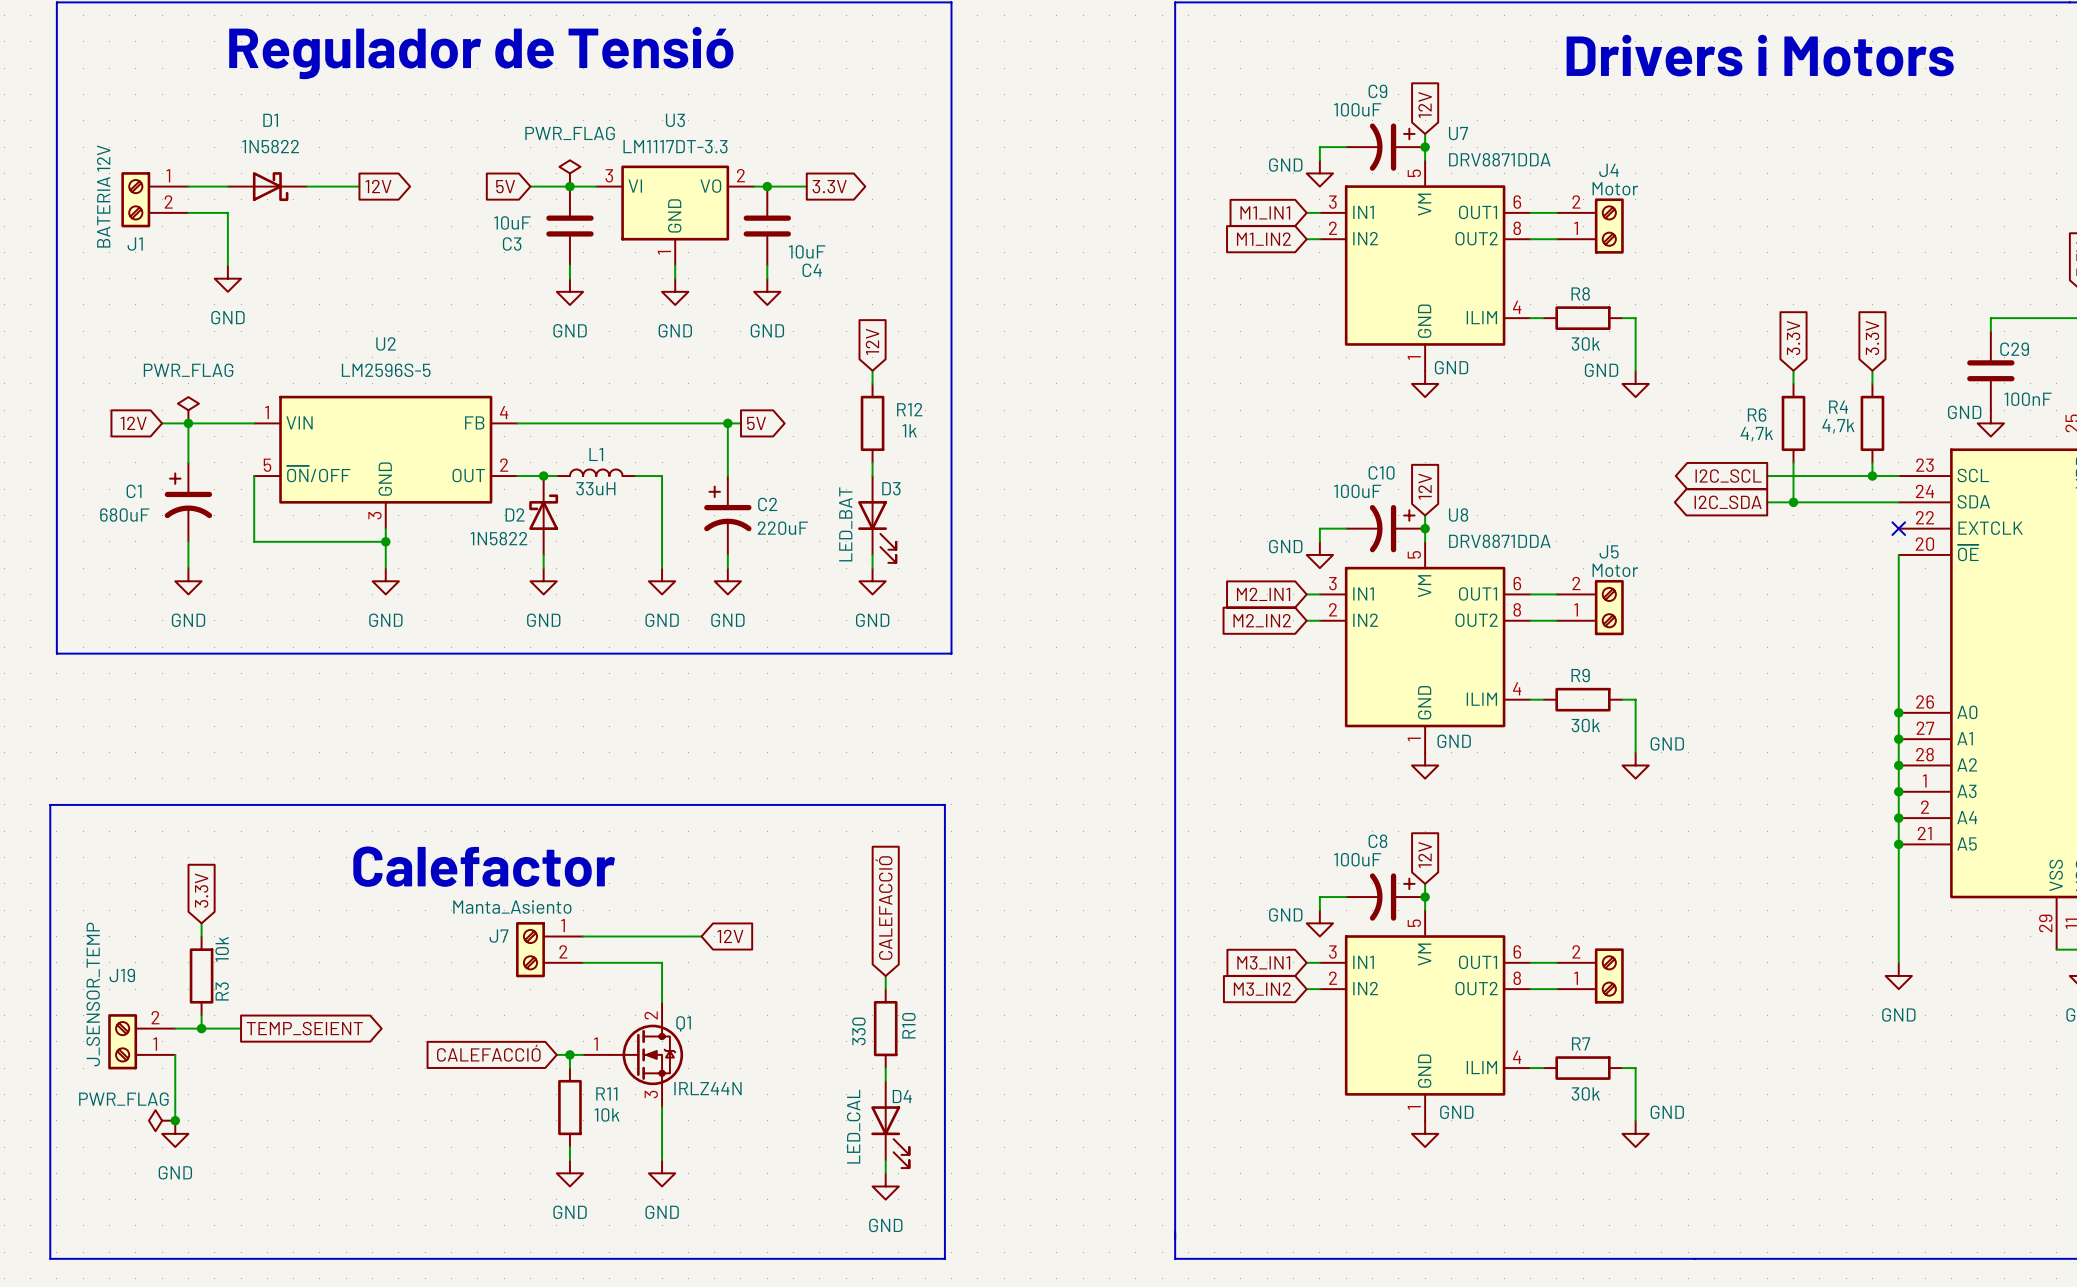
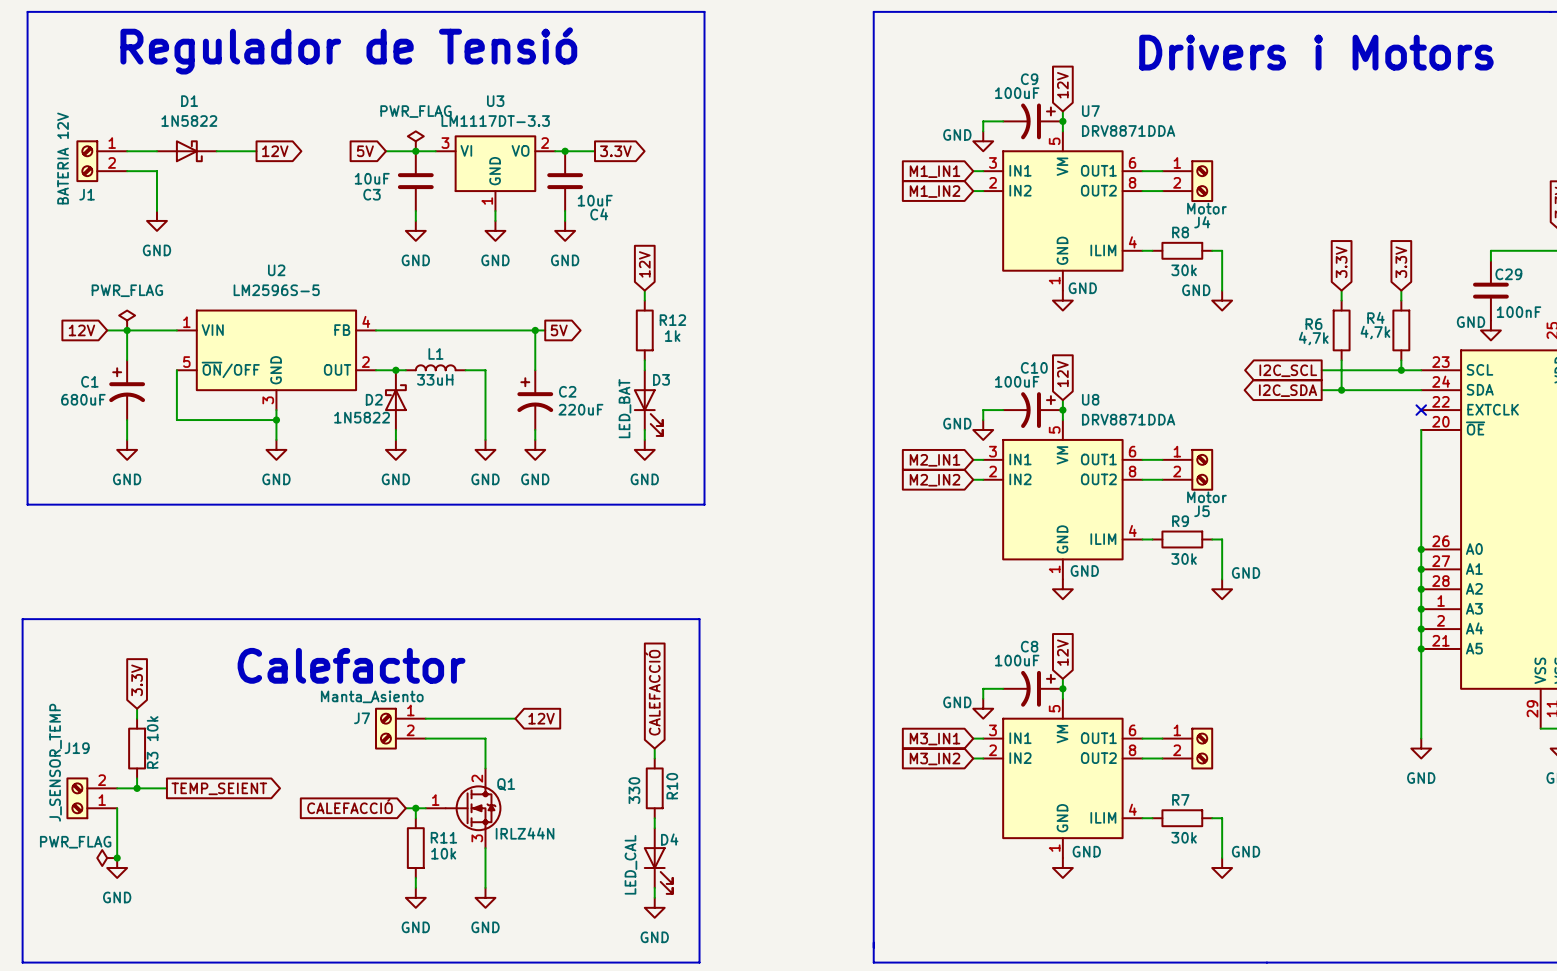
J4 flip: as is (1609, 226) -> up-down (1202, 181)
J5 flip: as is (1609, 607) -> up-down (1202, 469)
part flip: as is (1609, 975) -> up-down (1202, 748)

